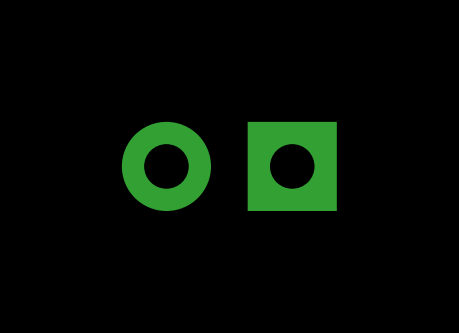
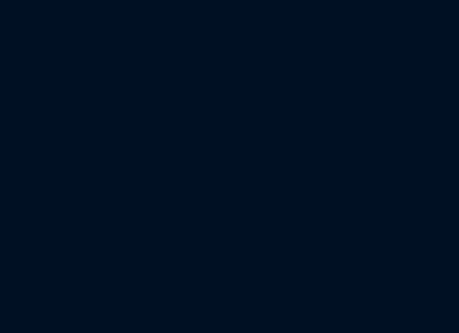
part: (229, 166) -> none

